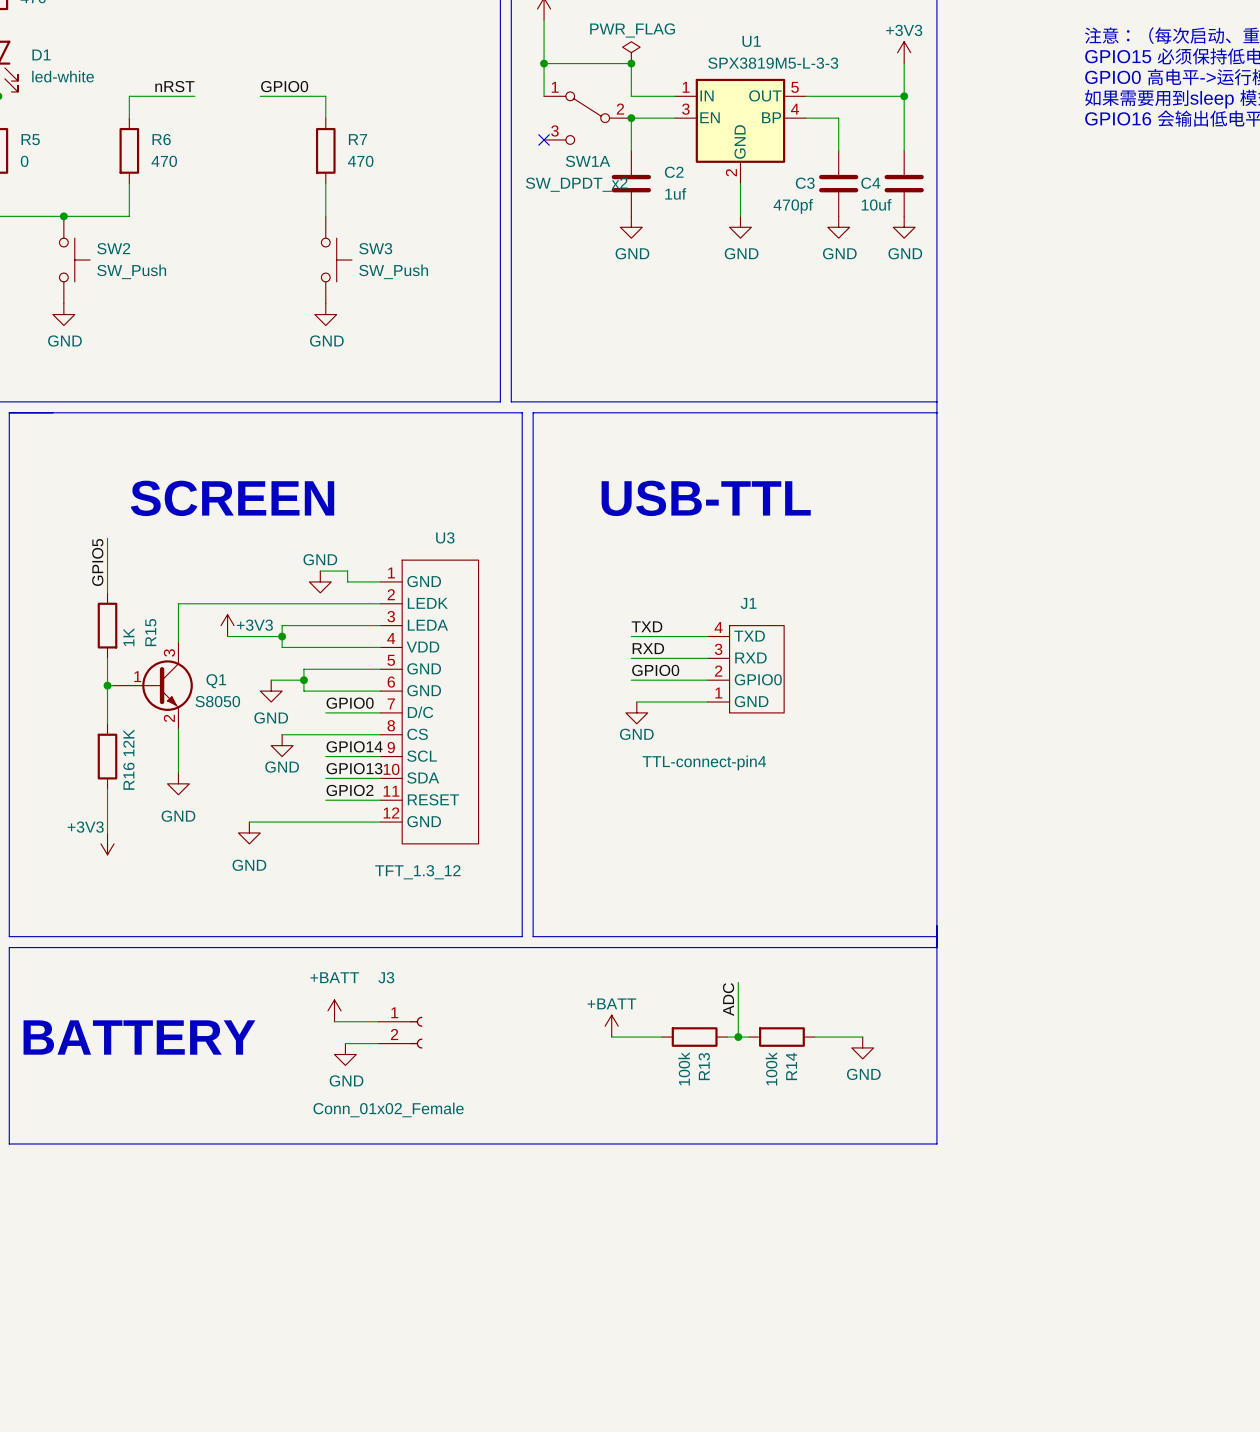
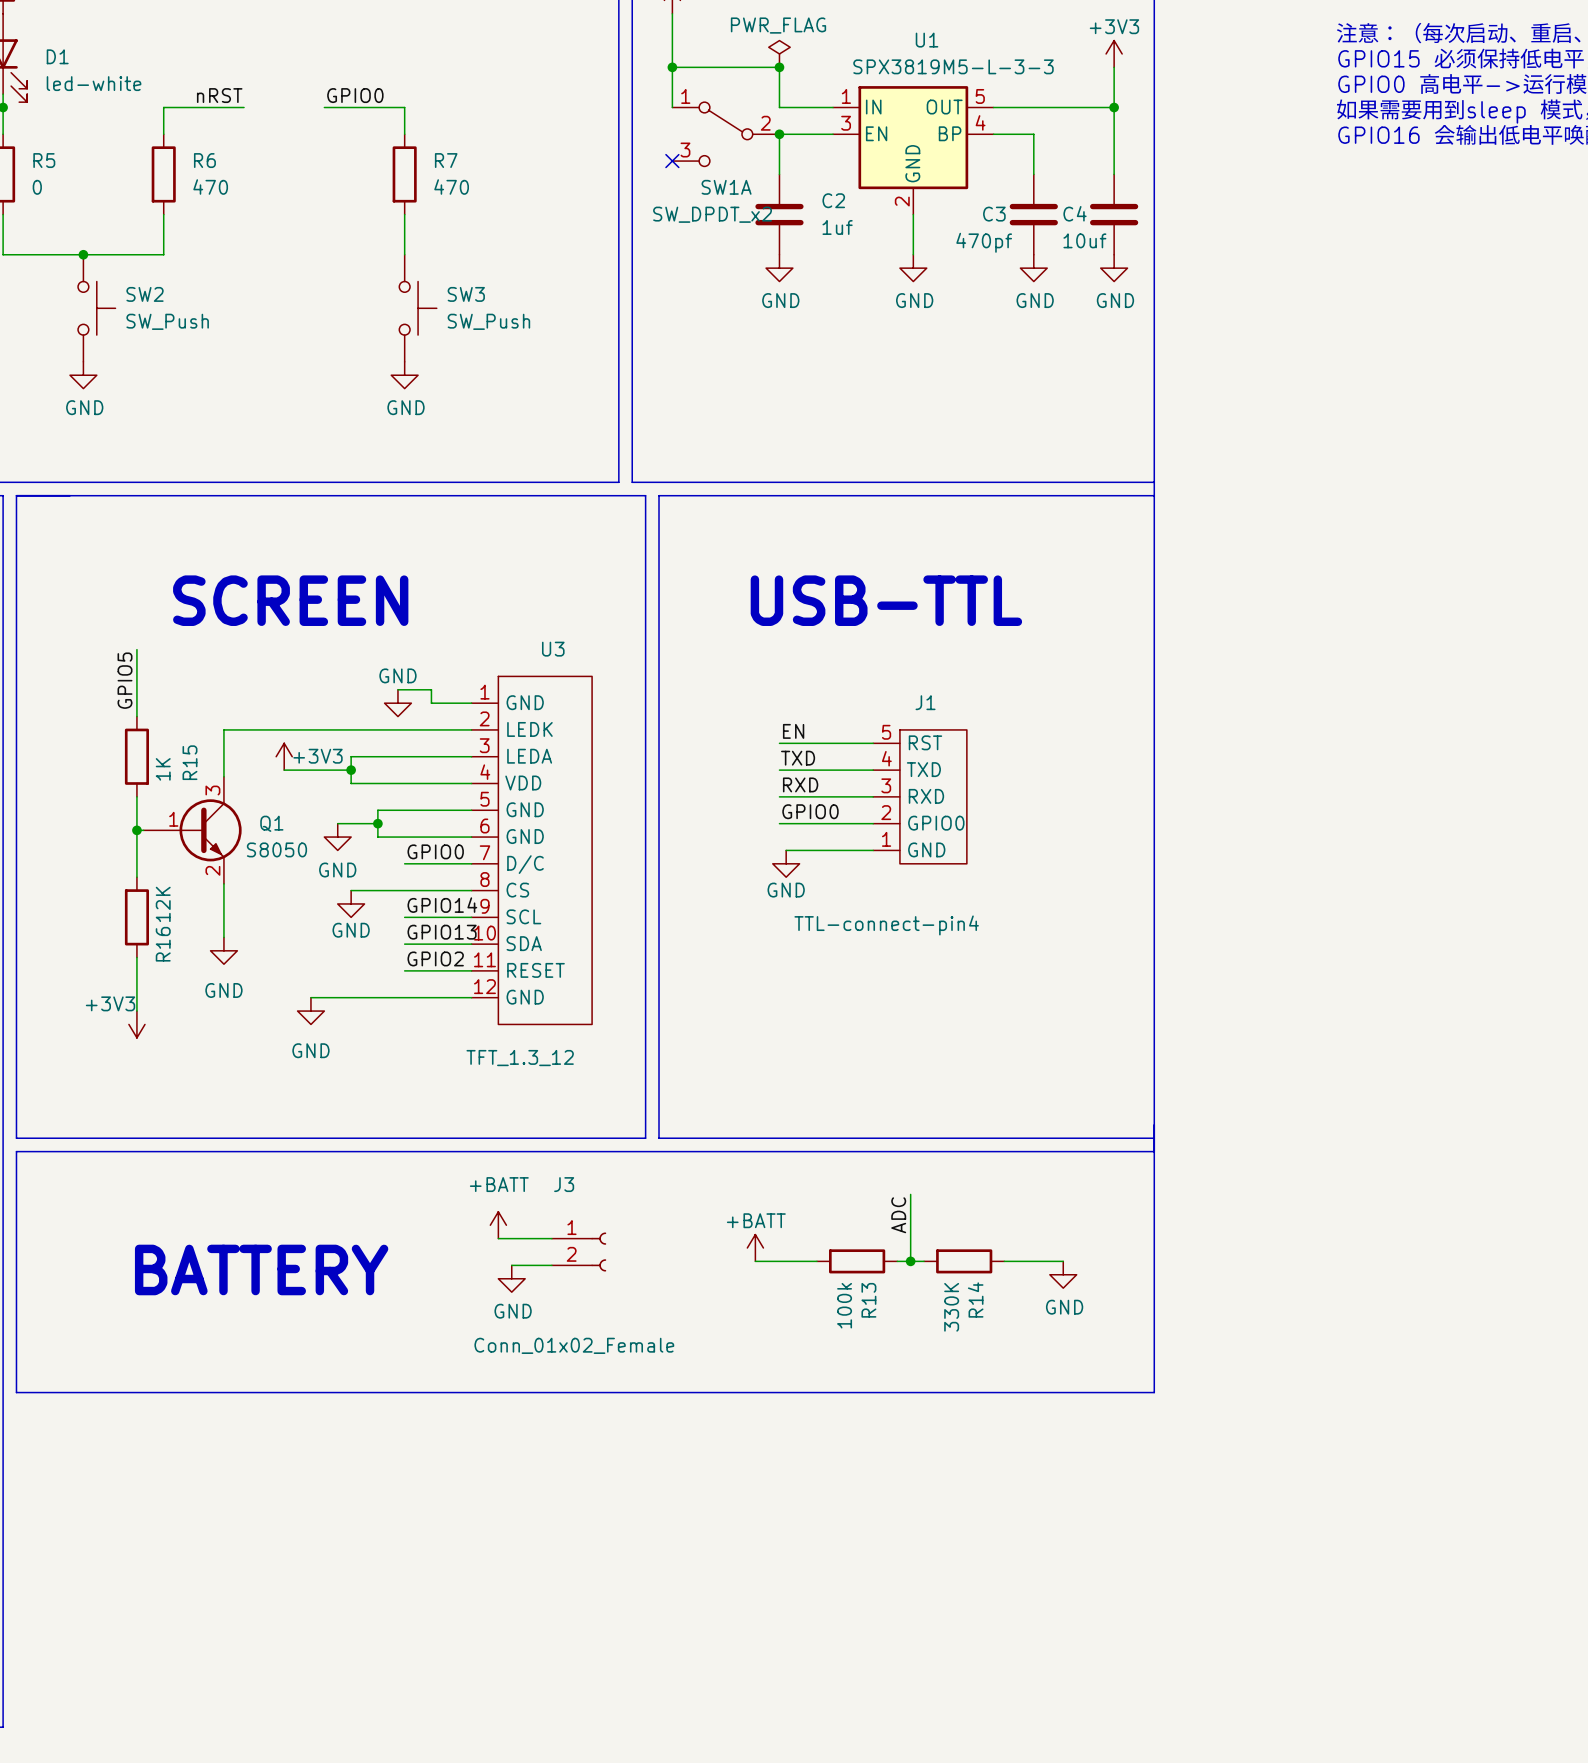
label: none -> EN (793, 731)
wire: none -> (779, 743) (873, 743)
J1 symbol: [707, 625, 785, 713] -> [873, 729, 967, 864]
power symbol position: +BATT (334, 1010) -> +BATT (498, 1225)
wire: (334, 1021) (378, 1021) -> (498, 1238) (551, 1238)
J3 position: (400, 1032) -> (579, 1252)
text position: BATTERY (139, 1037) -> BATTERY (261, 1269)
wire: (345, 1043) (378, 1043) -> (511, 1265) (551, 1265)
power symbol position: GND (345, 1054) -> GND (511, 1278)
R14 value: 100k (771, 1068) -> 330K (951, 1307)

